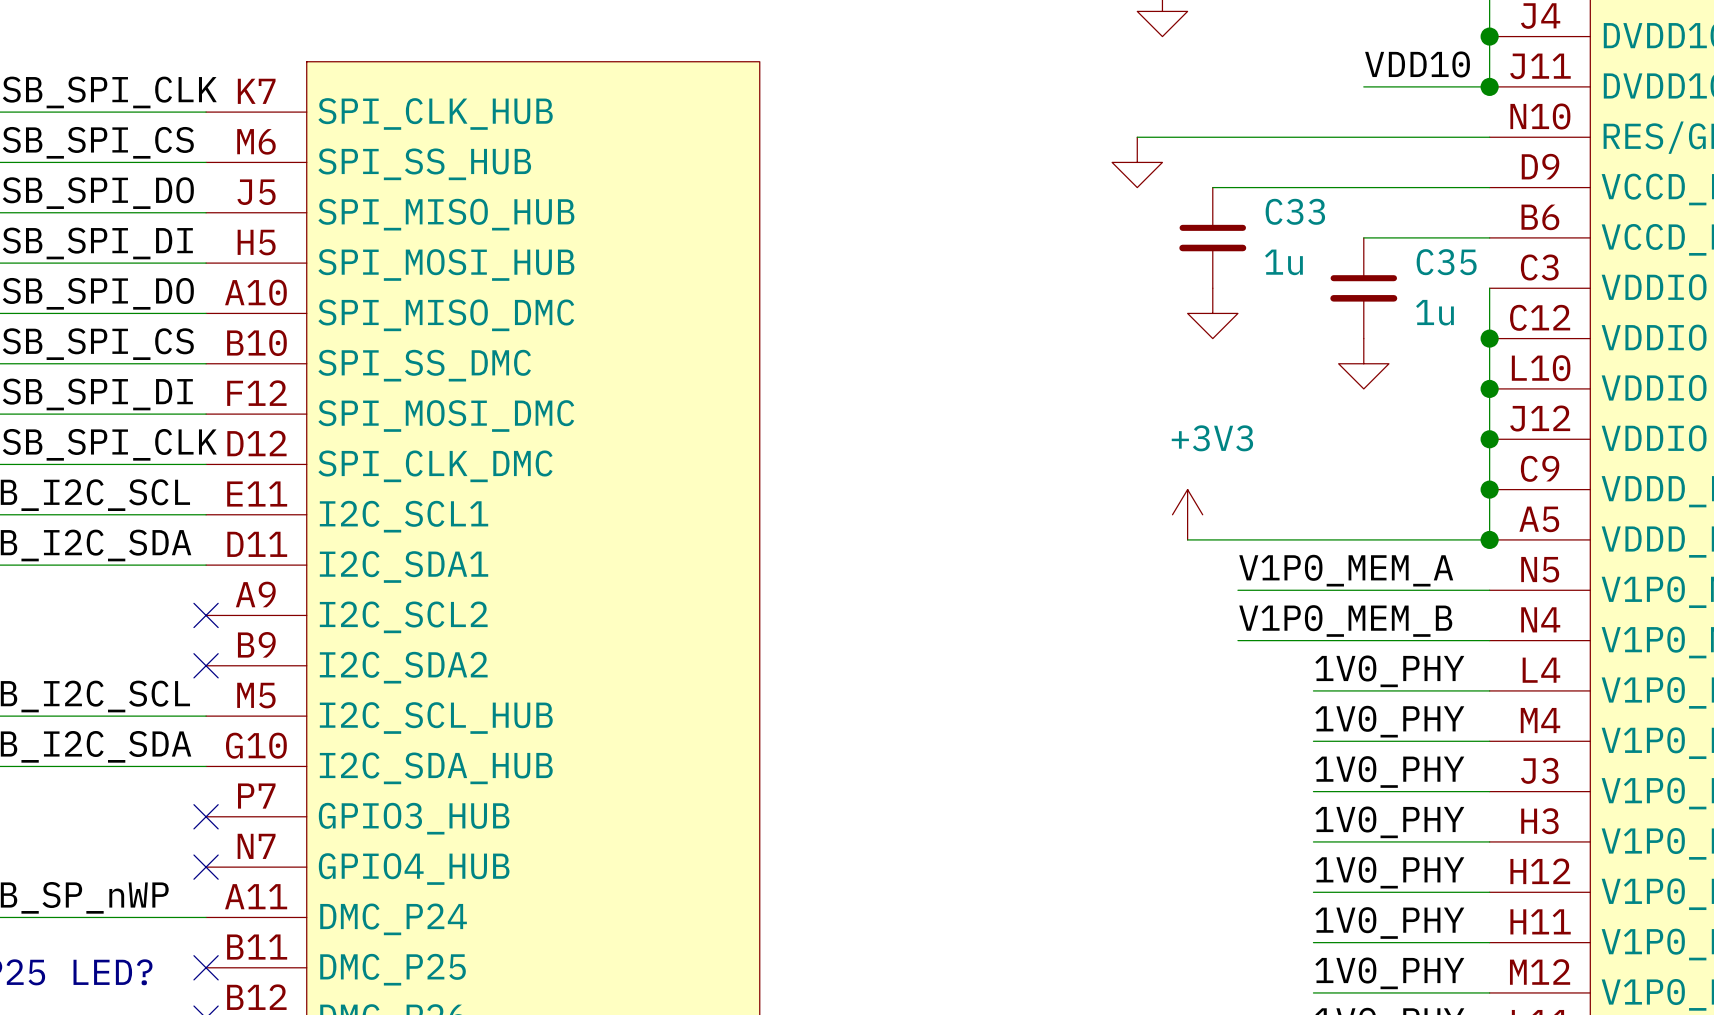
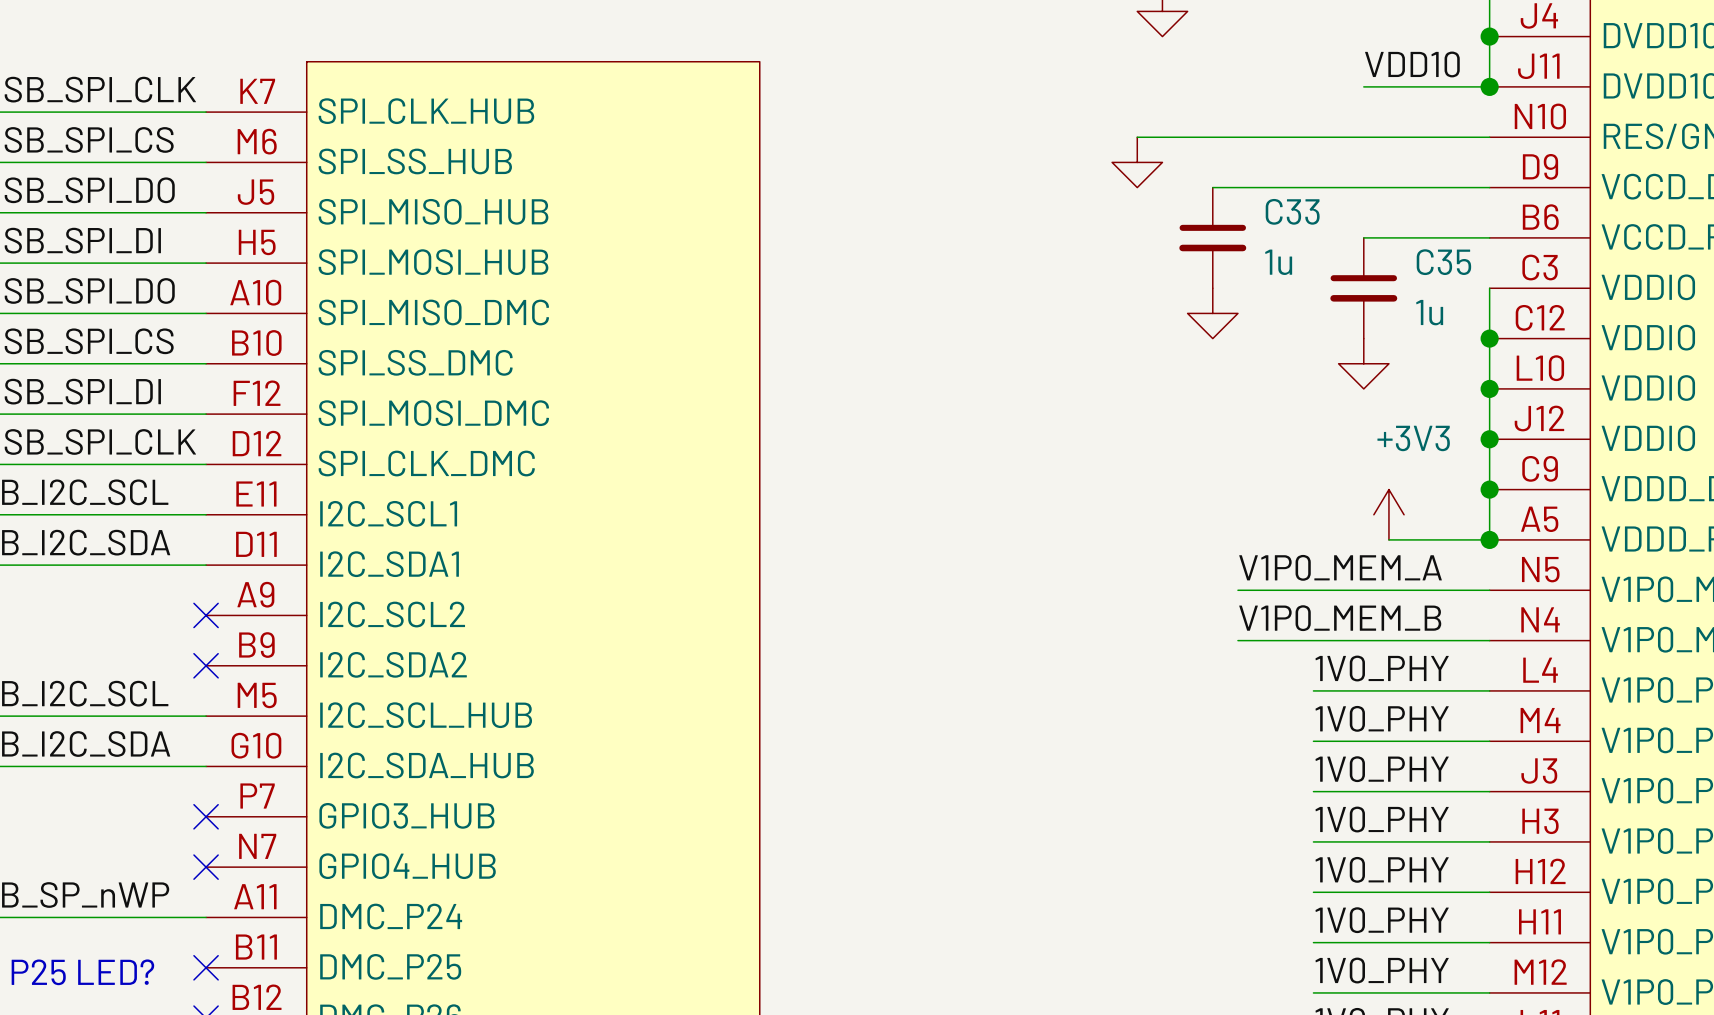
power symbol position: +3V3 (1187, 514) -> +3V3 (1388, 514)
wire: (1187, 539) (1388, 539) -> none

